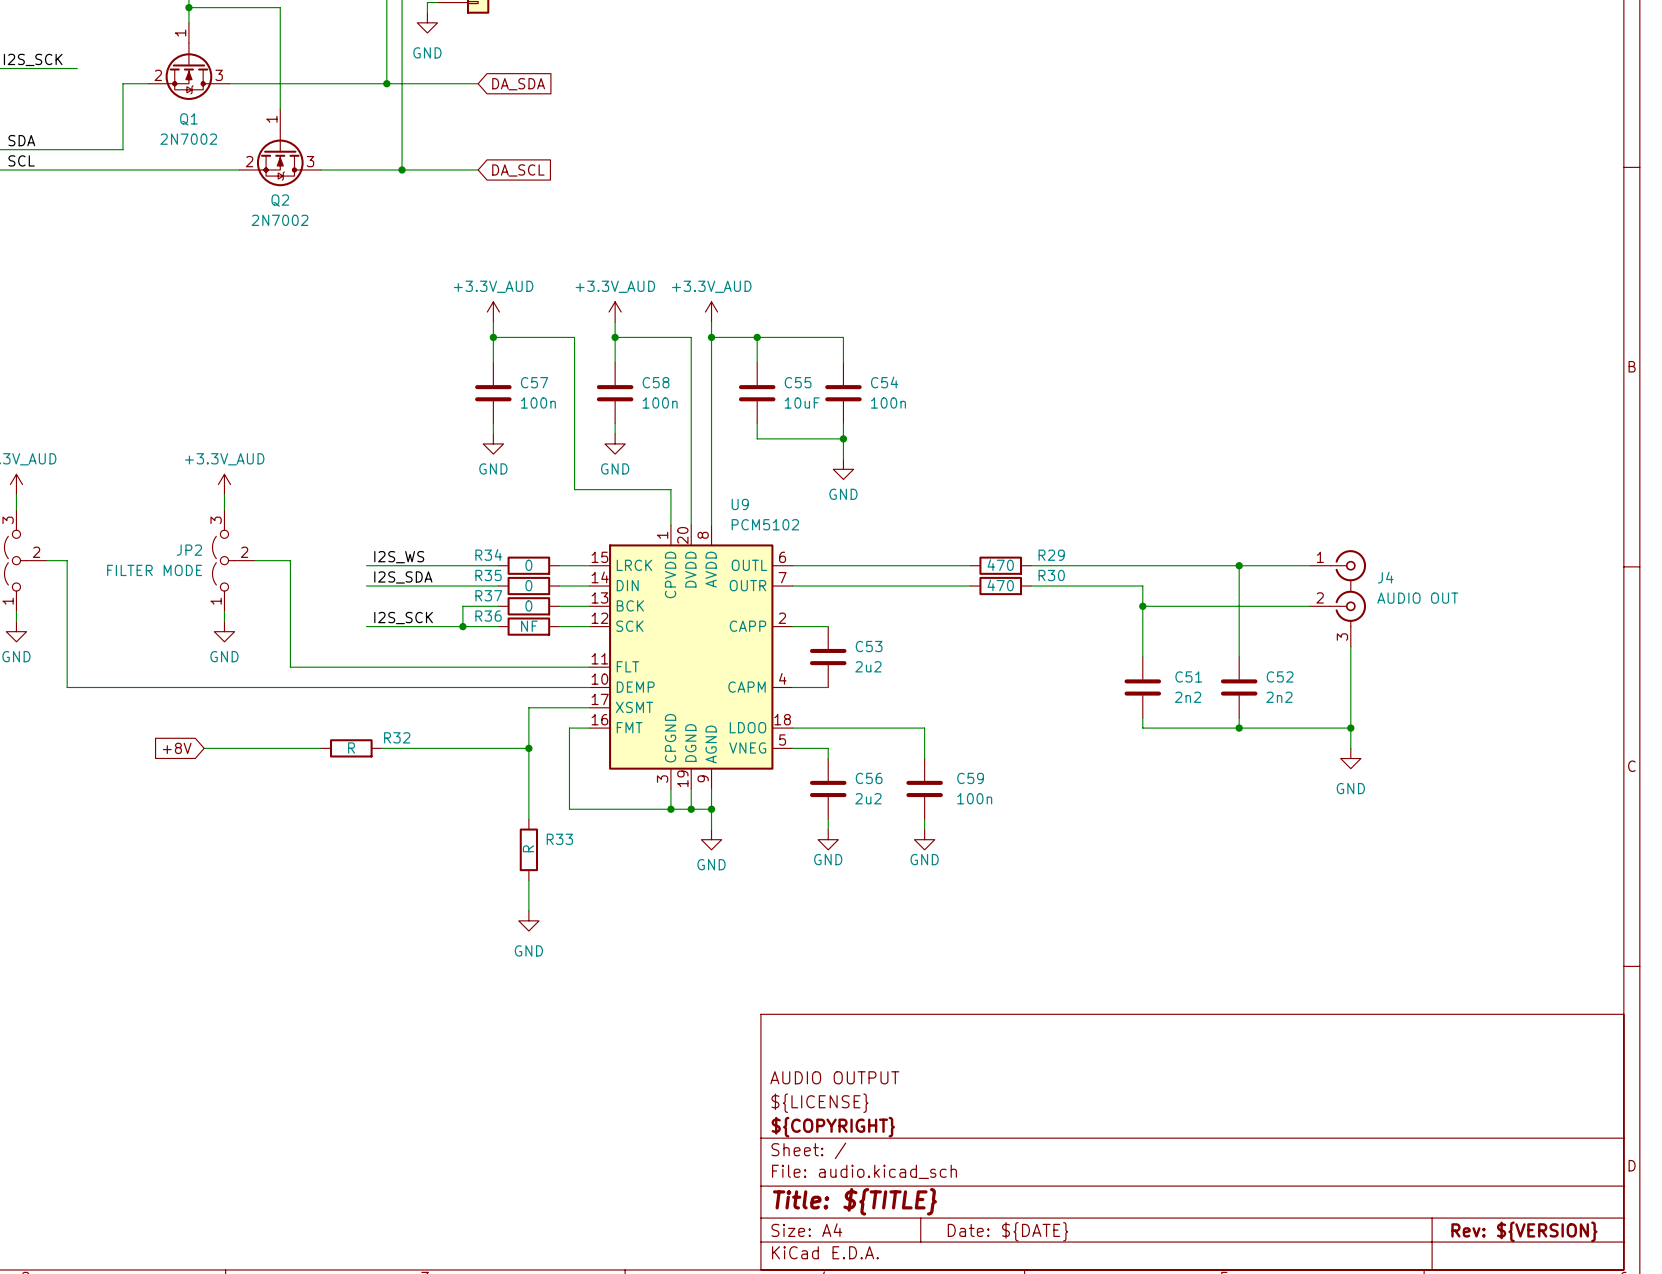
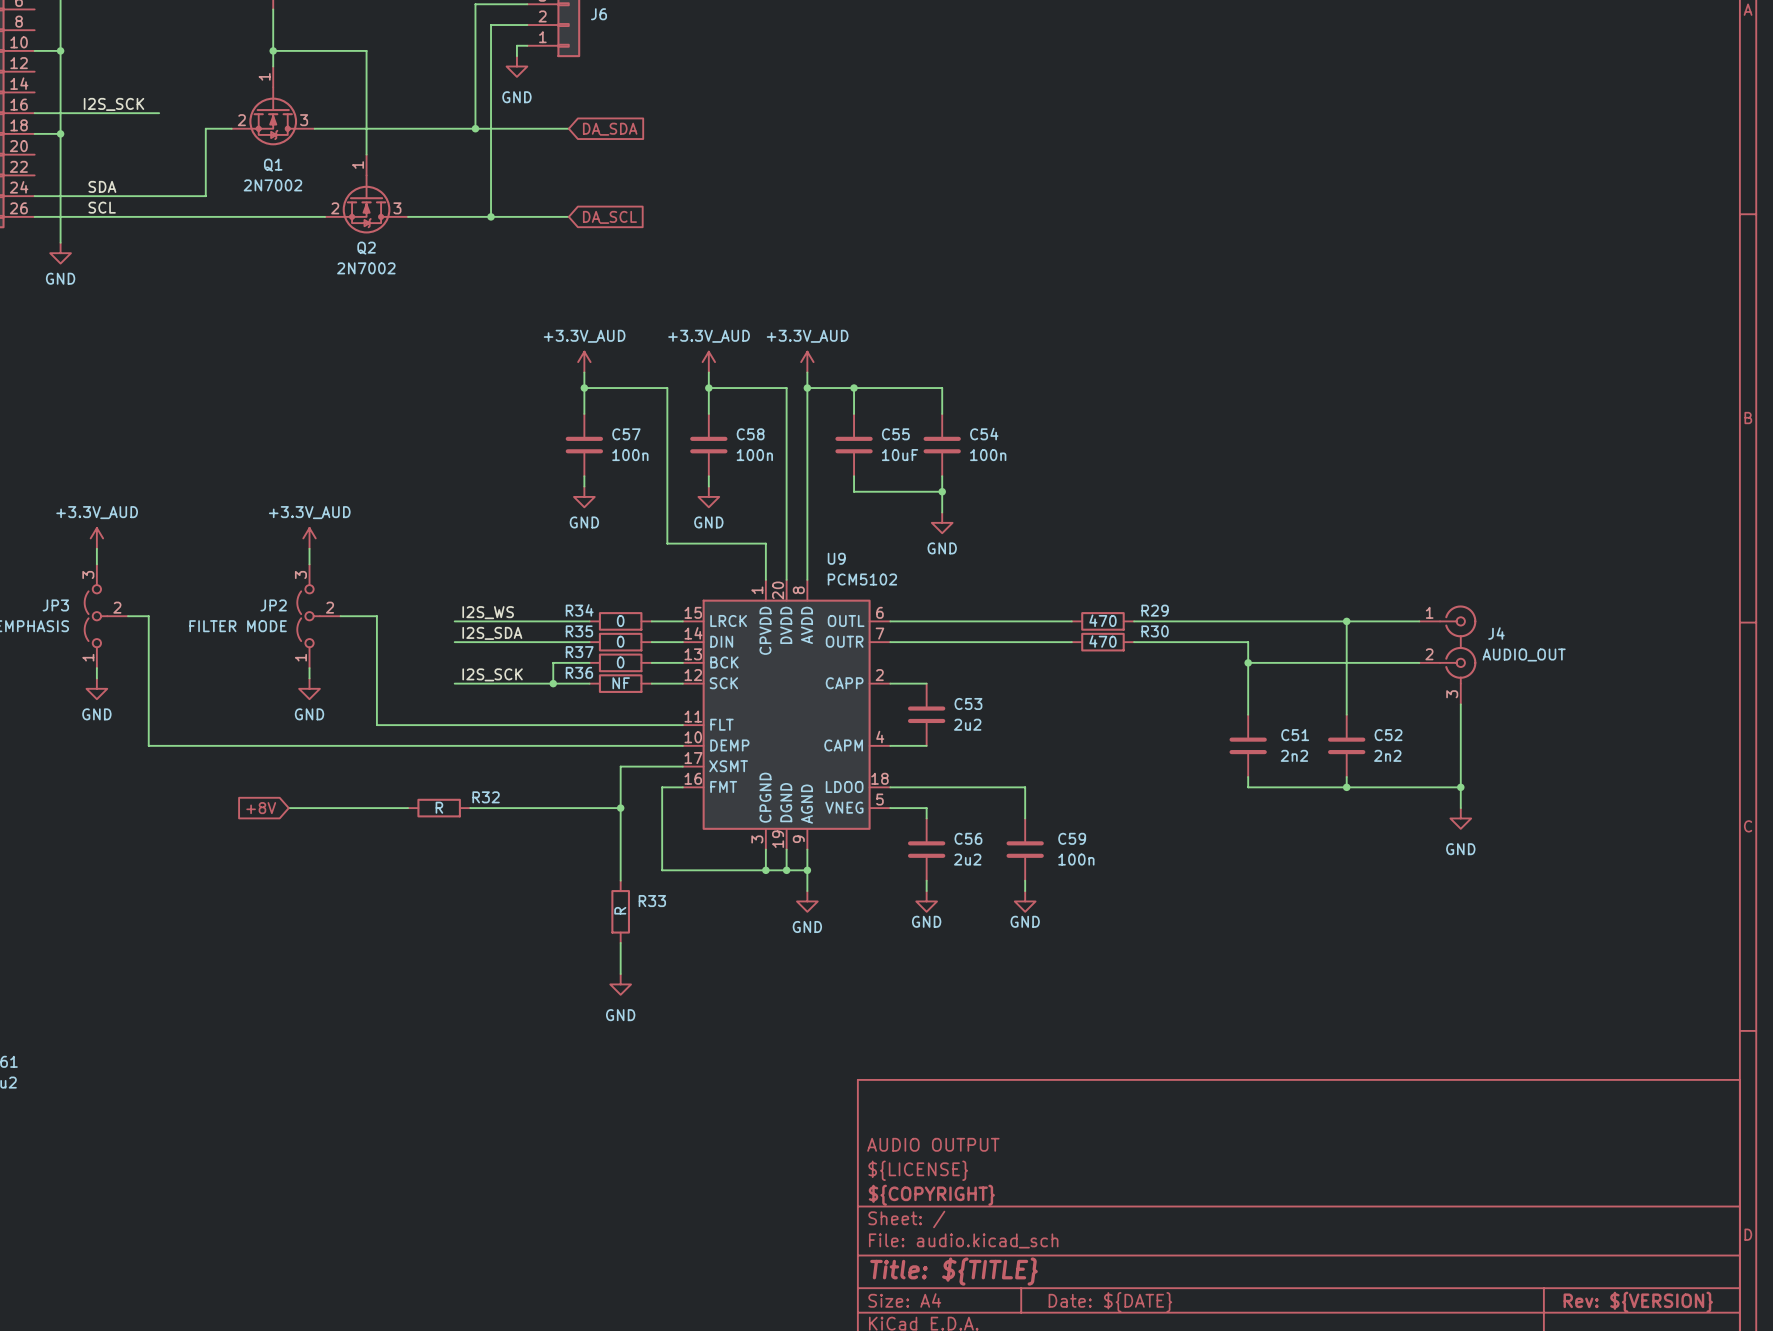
J4 value: AUDIO OUT (1417, 598) -> AUDIO_OUT (1524, 655)

